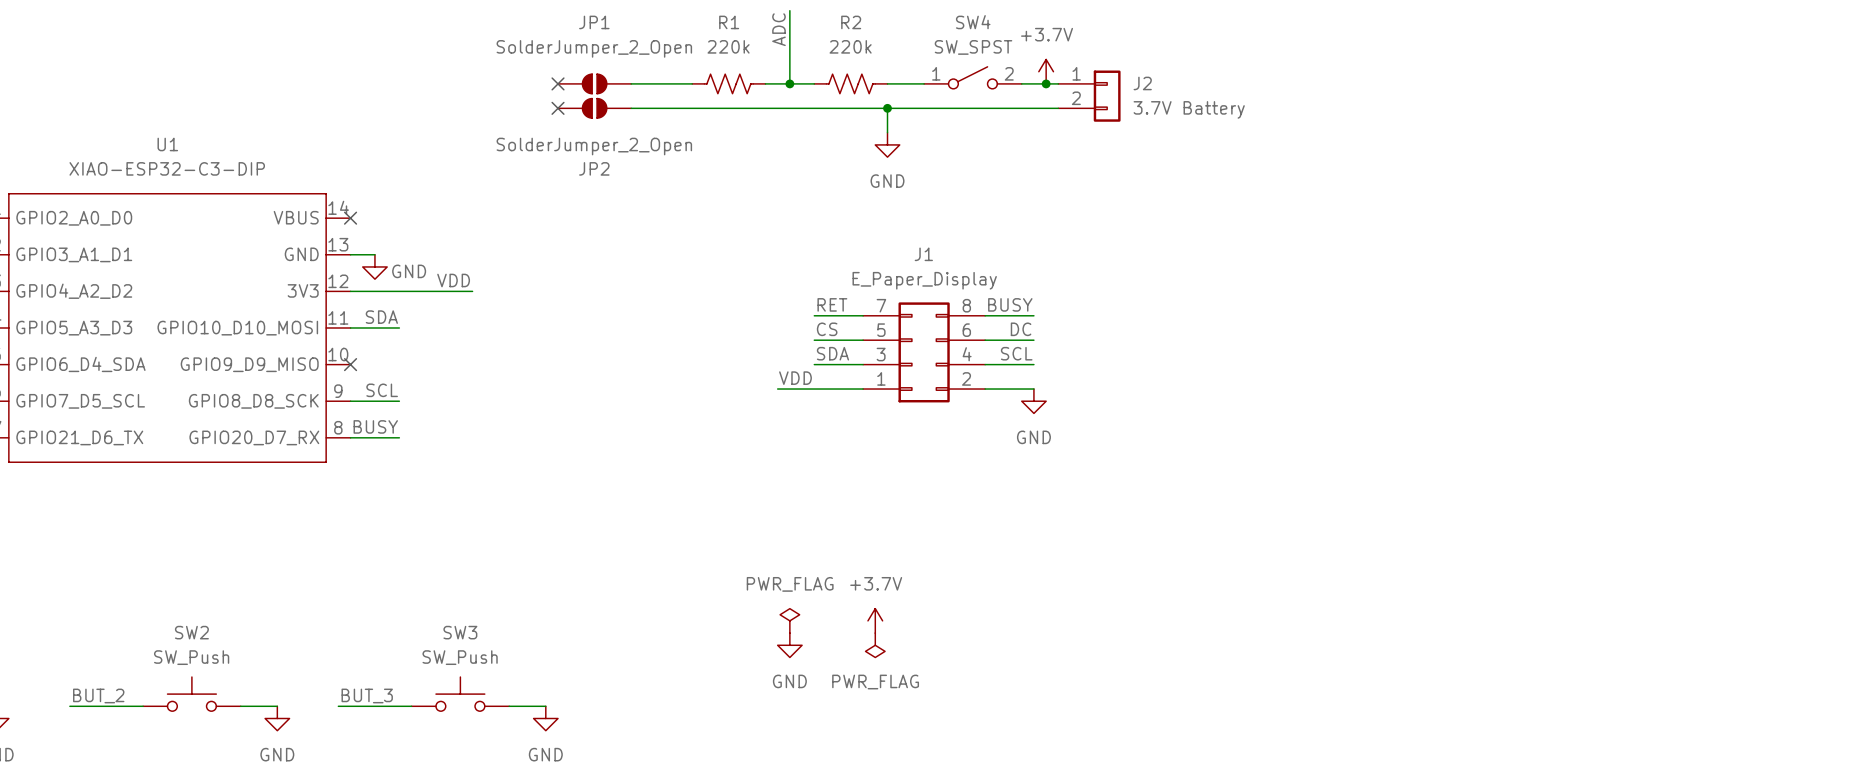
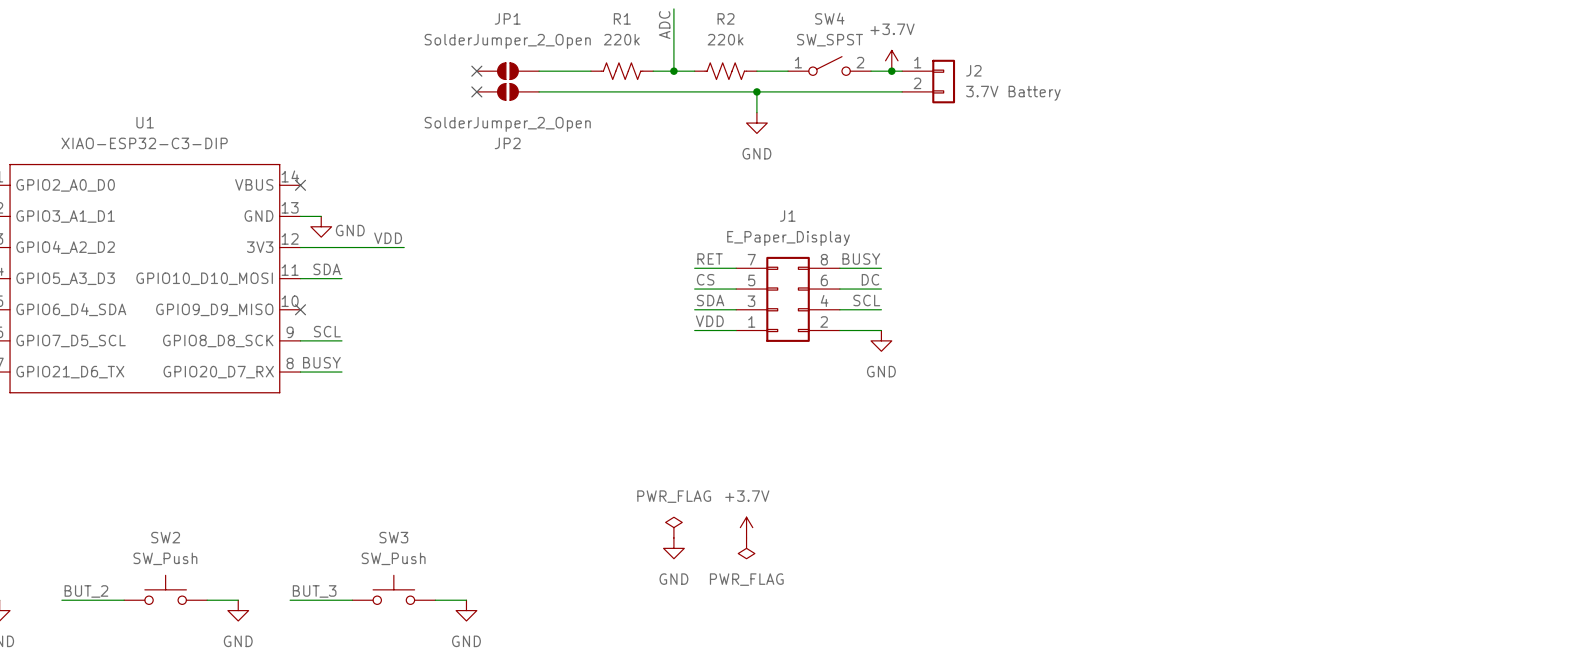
label position: VDD (795, 378) -> VDD (709, 321)
wire: (777, 389) (814, 389) -> none

